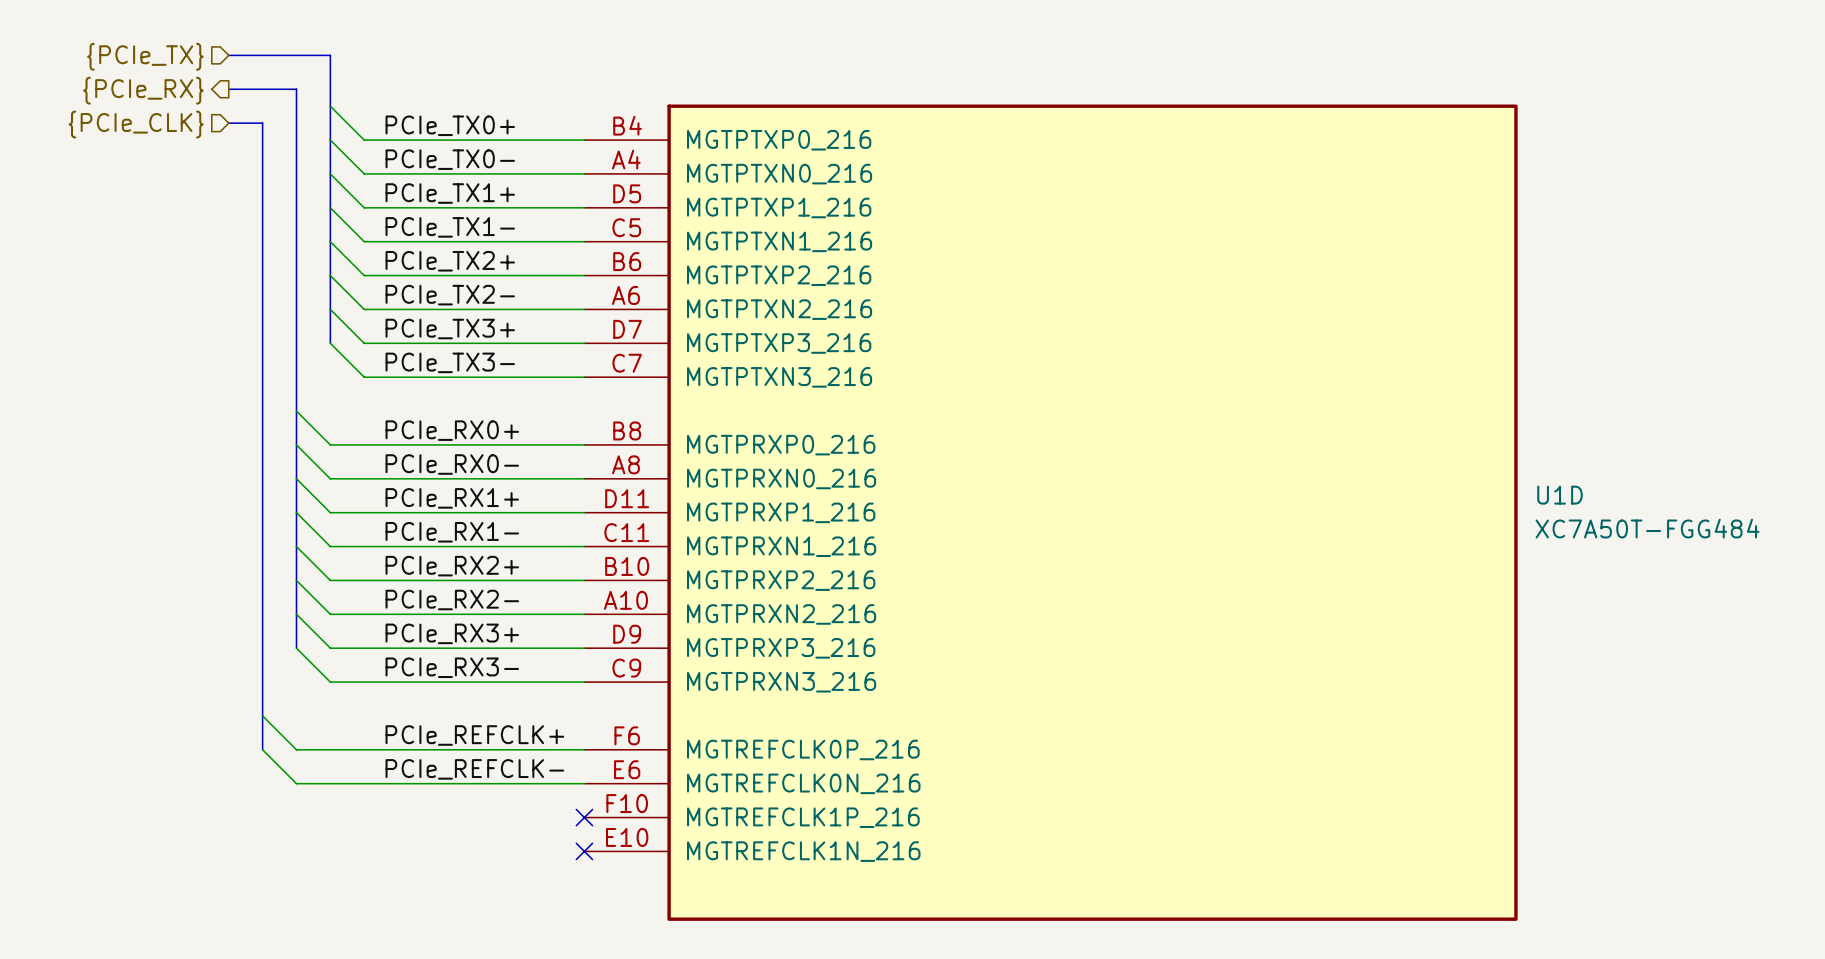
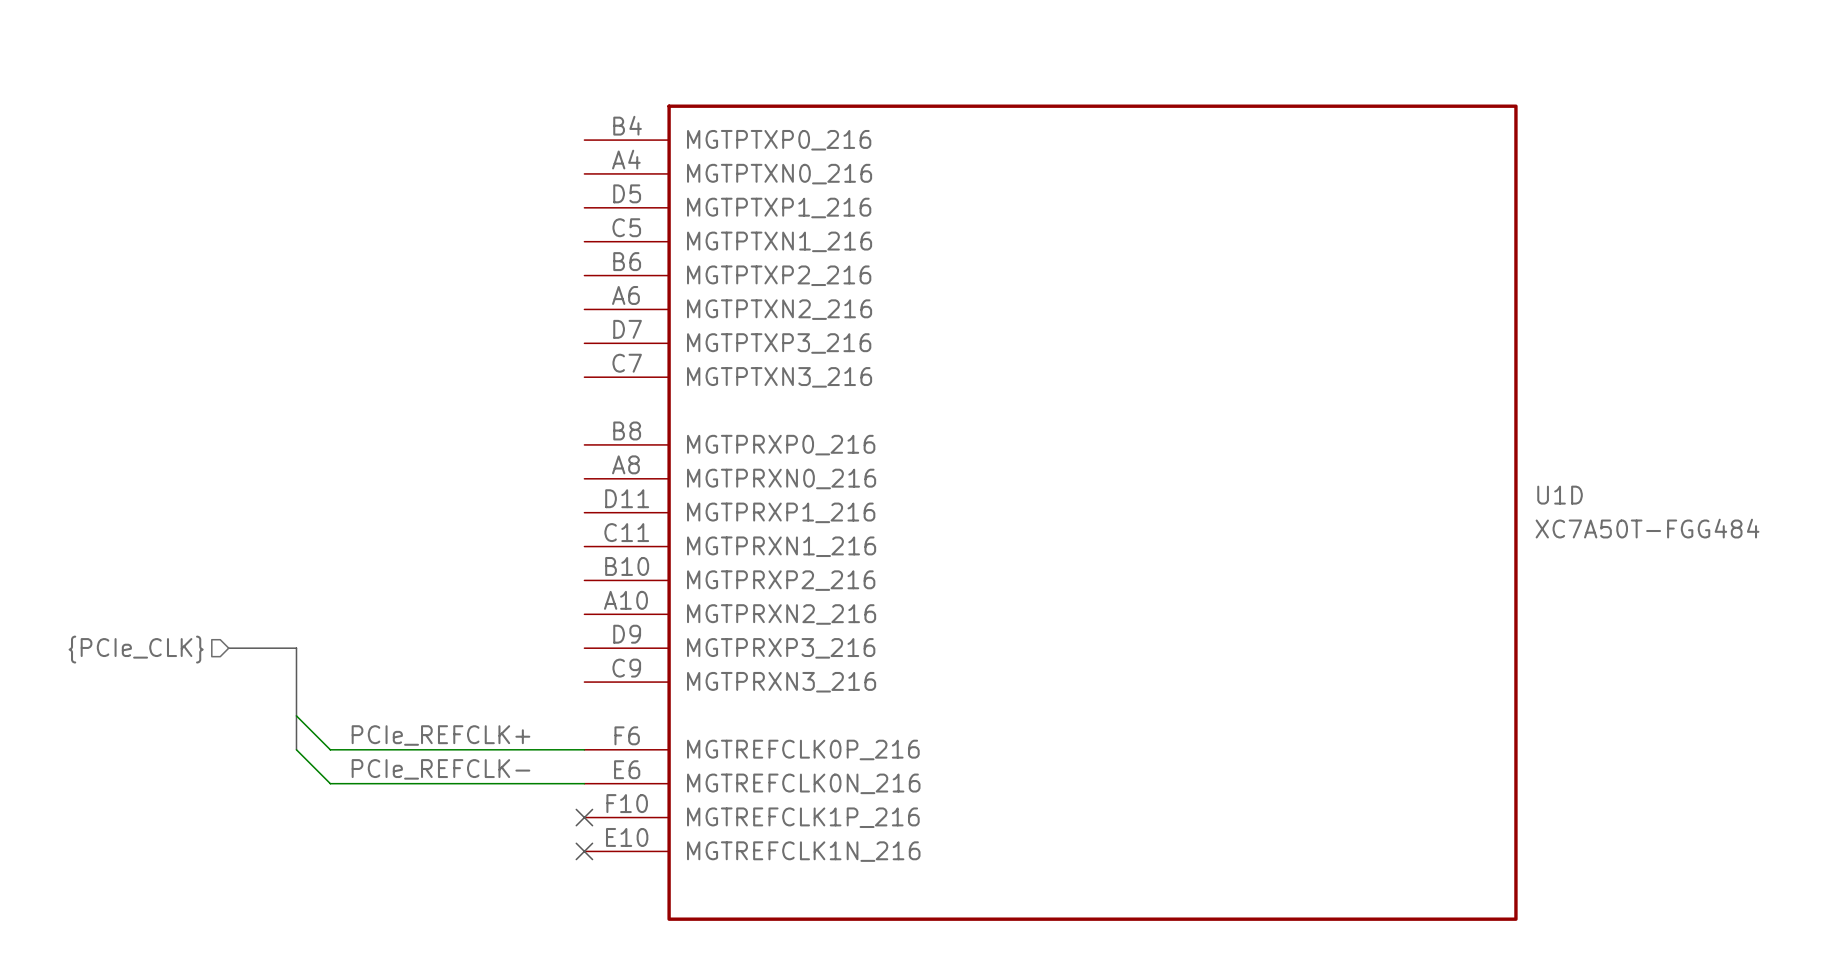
bus: (228, 55) (330, 55) (330, 343) -> none
hierarchical label: {PCIe_TX} (145, 56) -> none
bus: (228, 89) (296, 89) (296, 648) -> none
hierarchical label: {PCIe_RX} (143, 90) -> none
wire: (330, 106) (364, 140) (584, 140) -> none
bus: (228, 123) (262, 123) (262, 749) -> none
hierarchical label: {PCIe_CLK} (136, 124) -> none
label: PCIe_TX0+ (450, 125) -> none
wire: (330, 140) (364, 173) (584, 173) -> none
label: PCIe_TX0- (450, 159) -> none
wire: (330, 173) (364, 207) (584, 207) -> none
label: PCIe_TX1+ (450, 193) -> none
wire: (330, 207) (364, 241) (584, 241) -> none
label: PCIe_TX1- (450, 227) -> none
wire: (330, 241) (364, 275) (584, 275) -> none
label: PCIe_TX2+ (450, 261) -> none
wire: (330, 275) (364, 309) (584, 309) -> none
label: PCIe_TX2- (450, 295) -> none
wire: (330, 309) (364, 343) (584, 343) -> none
label: PCIe_TX3+ (450, 329) -> none
wire: (330, 343) (364, 377) (584, 377) -> none
label: PCIe_TX3- (450, 362) -> none
wire: (296, 411) (330, 444) (584, 444) -> none
label: PCIe_RX0+ (452, 430) -> none
wire: (296, 444) (330, 478) (584, 478) -> none
label: PCIe_RX0- (452, 464) -> none
wire: (296, 478) (330, 512) (584, 512) -> none
label: PCIe_RX1+ (452, 498) -> none
wire: (296, 512) (330, 546) (584, 546) -> none
label: PCIe_RX1- (452, 532) -> none
wire: (296, 546) (330, 580) (584, 580) -> none
label: PCIe_RX2+ (452, 566) -> none
wire: (296, 580) (330, 614) (584, 614) -> none
label: PCIe_RX2- (452, 600) -> none
wire: (296, 614) (330, 648) (584, 648) -> none
label: PCIe_RX3+ (452, 633) -> none
bus: none -> (228, 648) (296, 648) (296, 749)
wire: (296, 648) (330, 682) (584, 682) -> none
hierarchical label: none -> {PCIe_CLK} (136, 649)
label: PCIe_RX3- (452, 667) -> none
wire: (262, 715) (296, 749) (330, 749) -> (296, 715) (330, 749)
label position: PCIe_REFCLK+ (474, 735) -> PCIe_REFCLK+ (440, 735)
wire: (262, 749) (296, 783) (330, 783) -> (296, 749) (330, 783)
label position: PCIe_REFCLK- (474, 769) -> PCIe_REFCLK- (440, 769)

